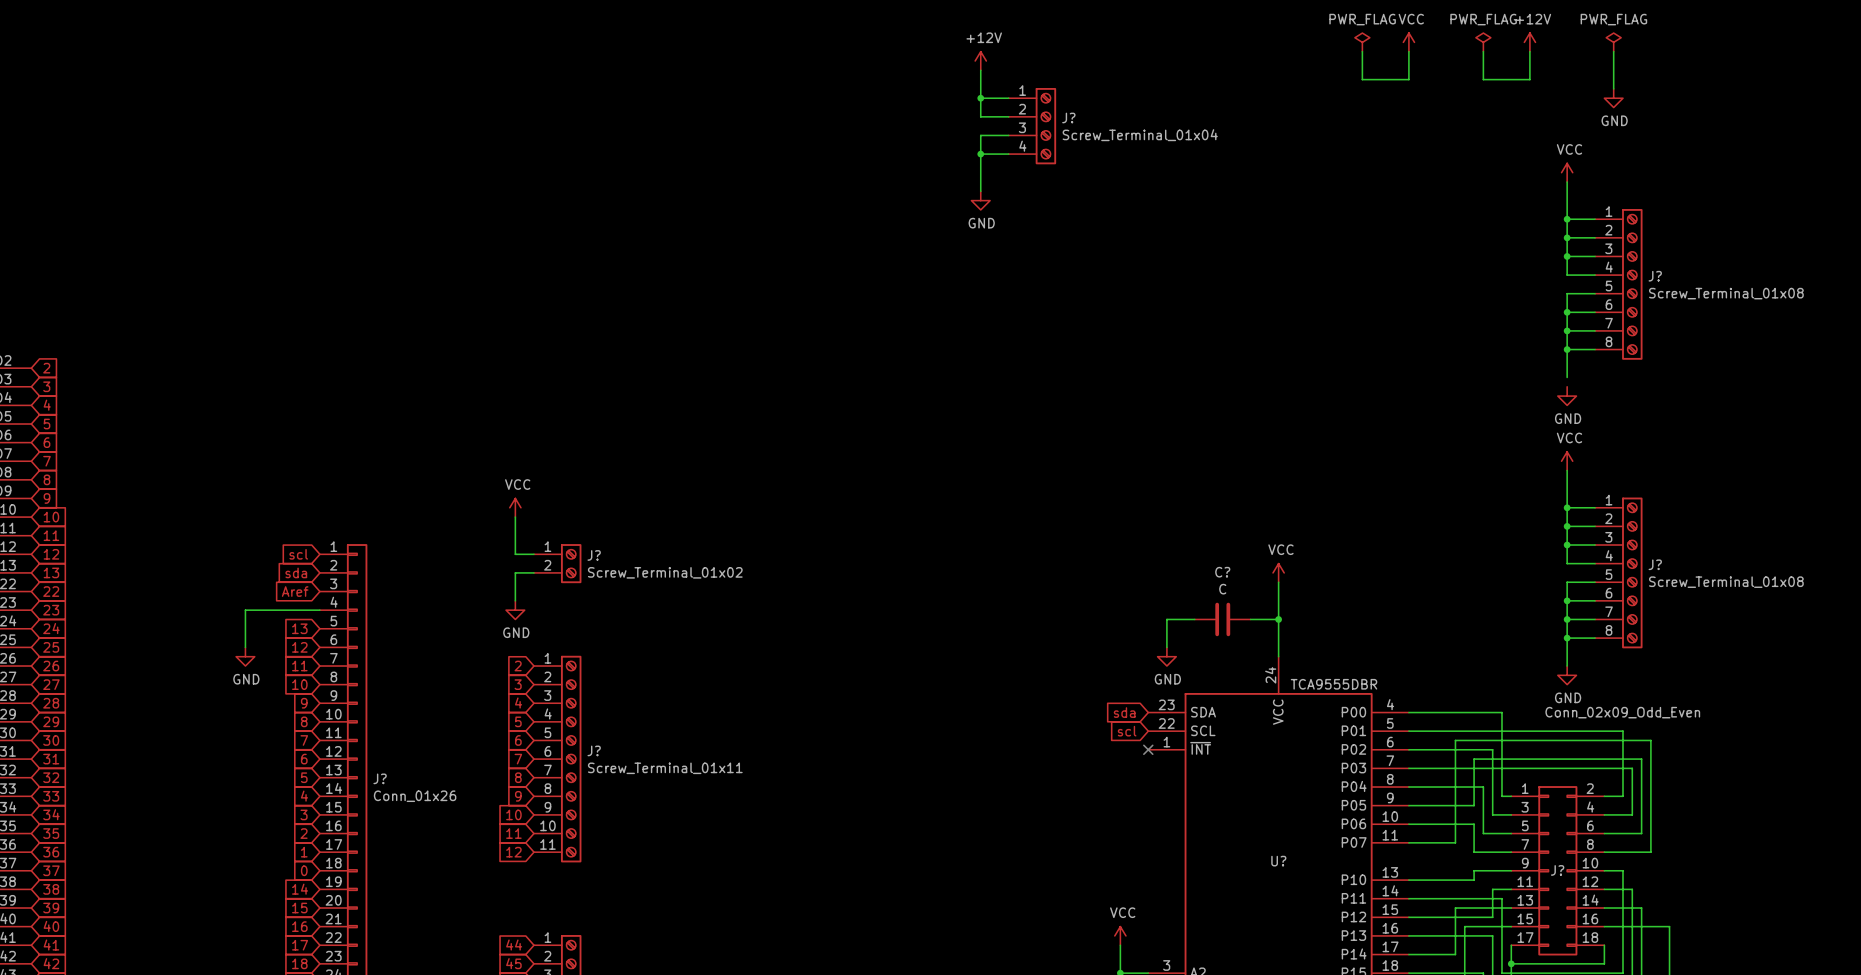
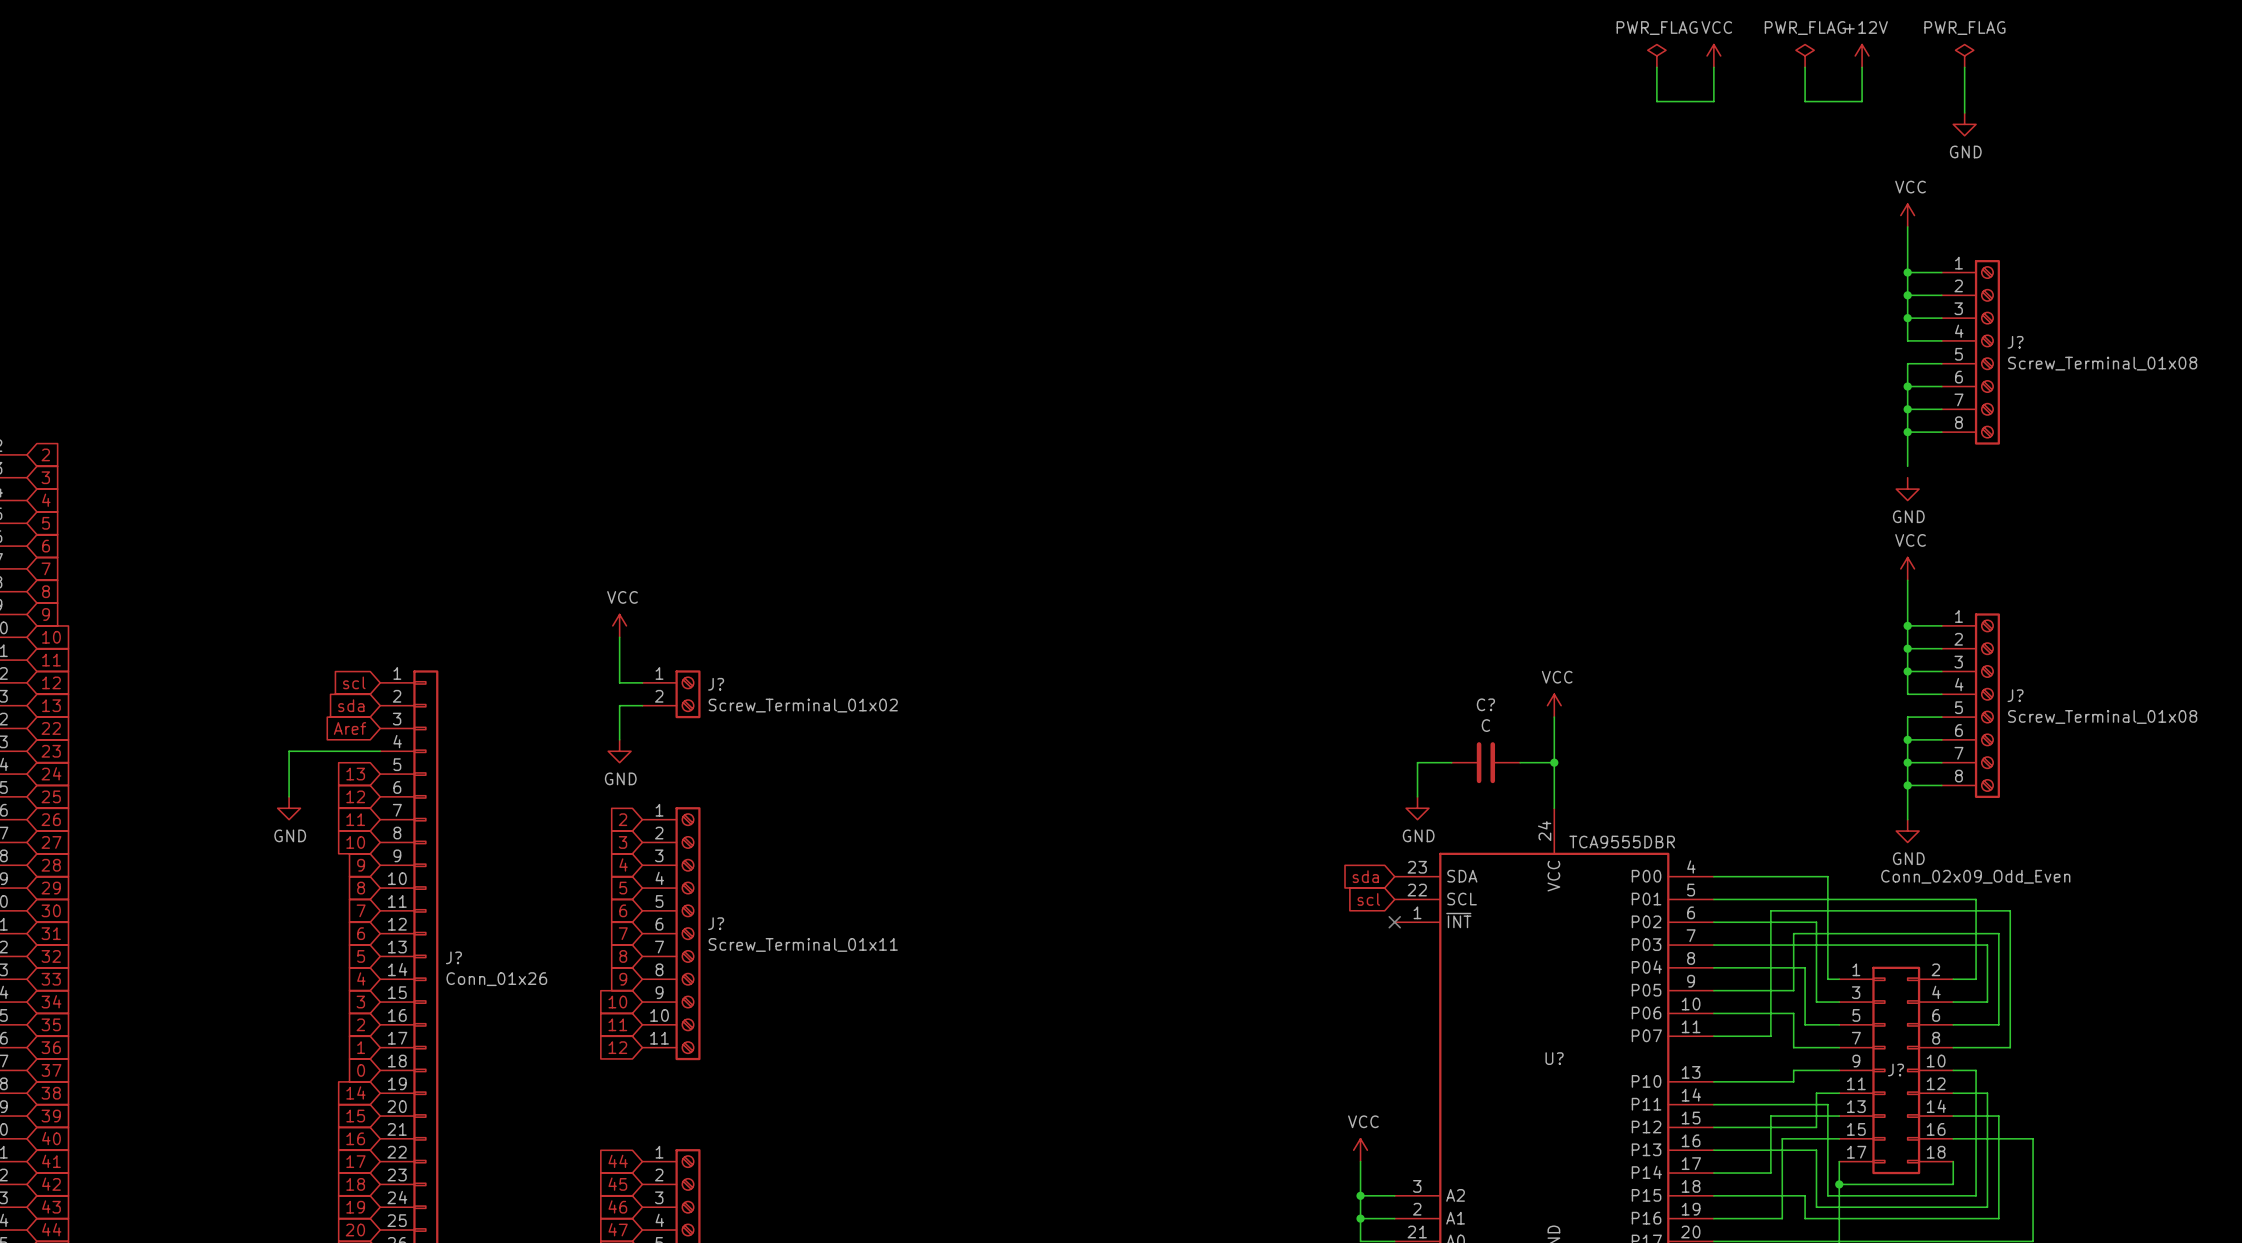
power symbol: +12V (980, 61) -> none
wire: (980, 70) (980, 116) (1008, 116) -> none
wire: (980, 98) (1008, 98) -> none
junction: (980, 98) -> none
J?: Screw_Terminal_01x04 (1032, 126) -> none
wire: (1008, 135) (980, 135) (980, 191) -> none
wire: (980, 154) (1008, 154) -> none
junction: (980, 154) -> none
power symbol: GND (980, 200) -> none

